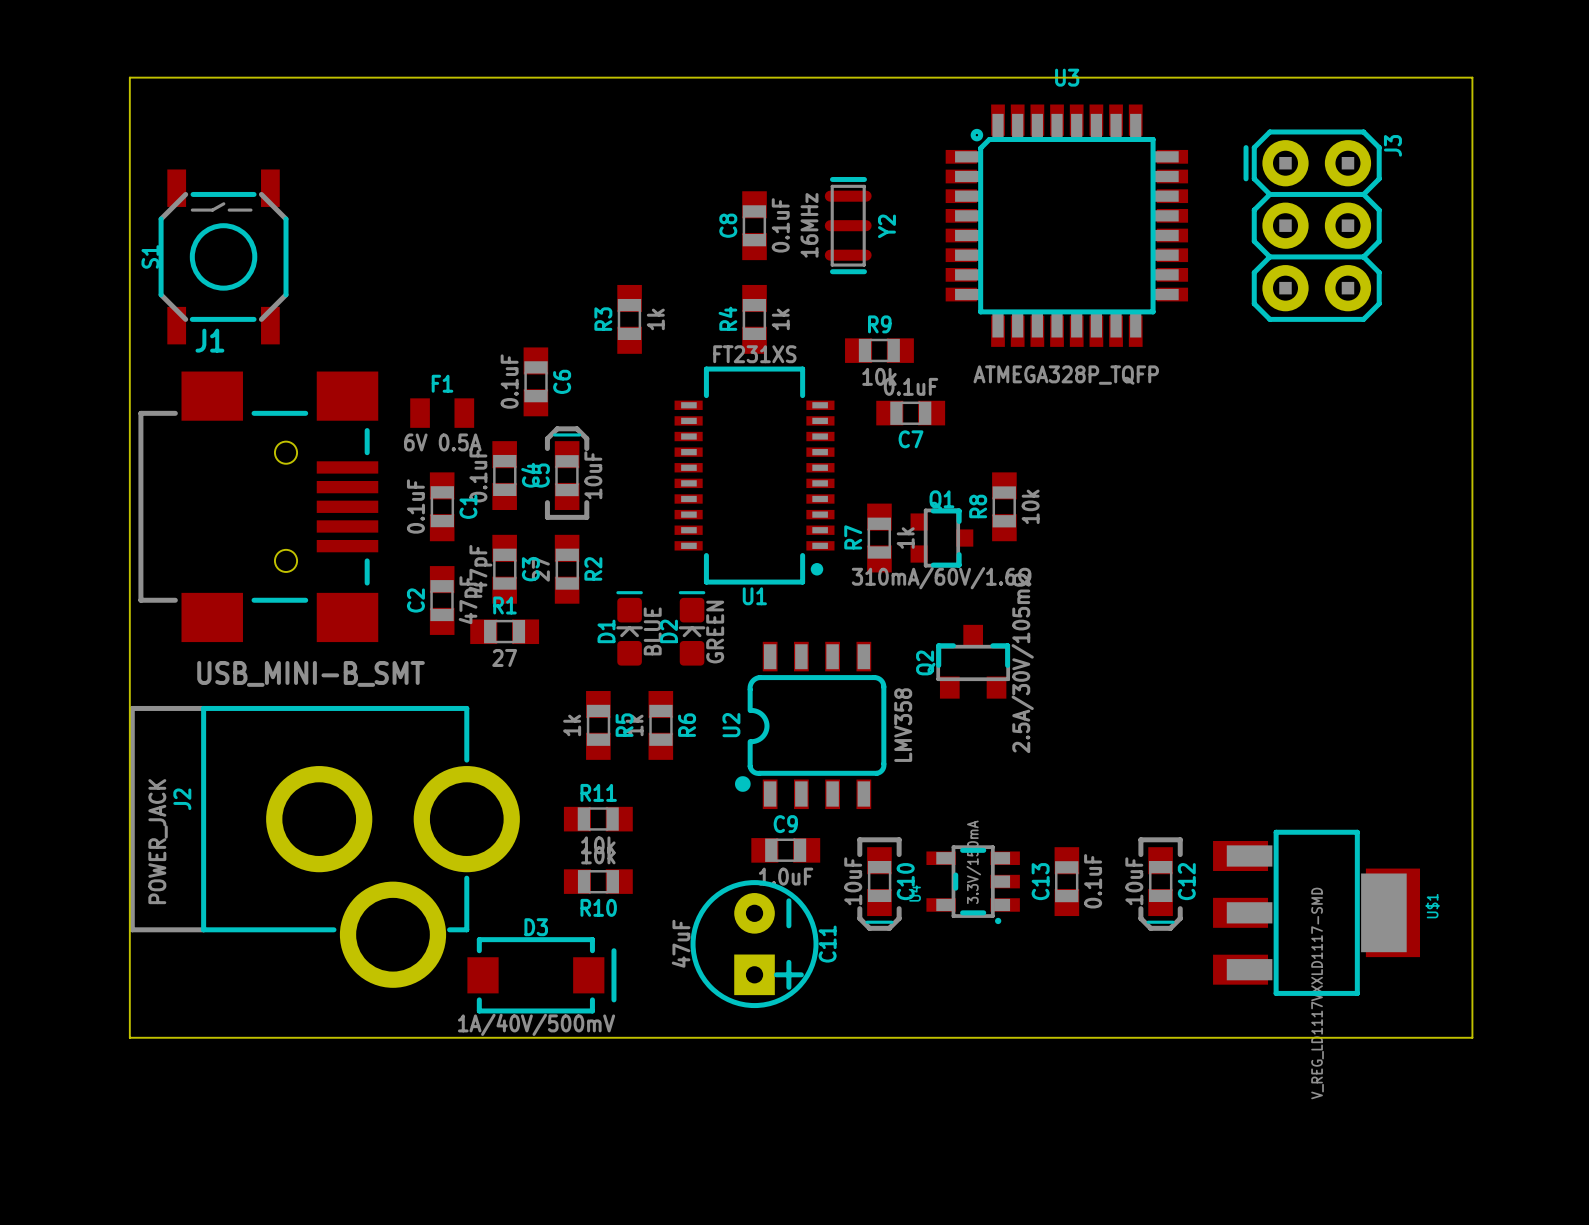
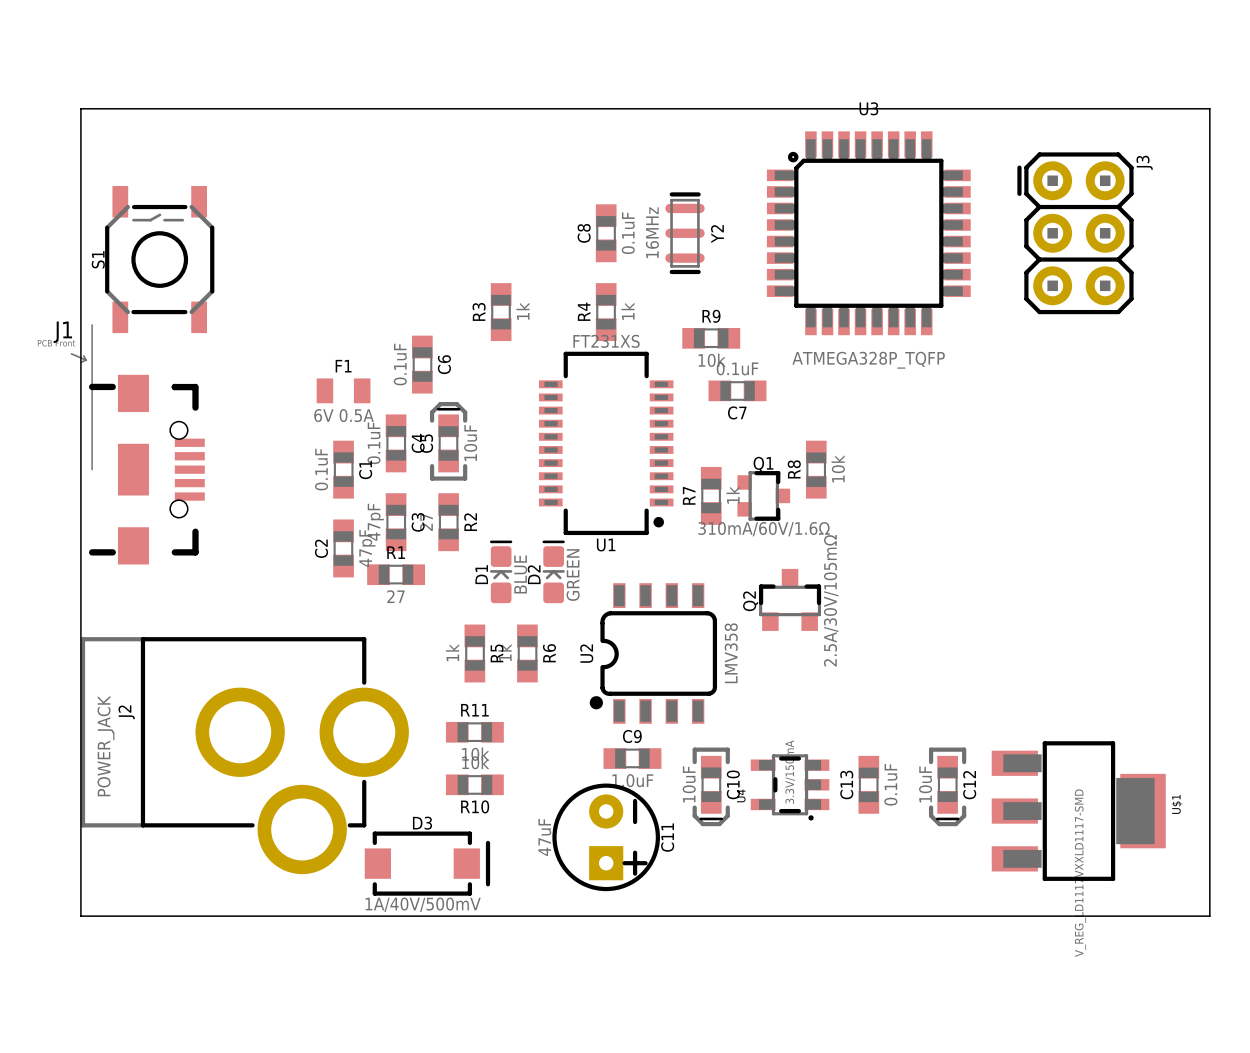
J1 footprint: [138, 371, 379, 643] -> [70, 324, 205, 565]
J1 value: USB_MINI-B_SMT (311, 673) -> none

